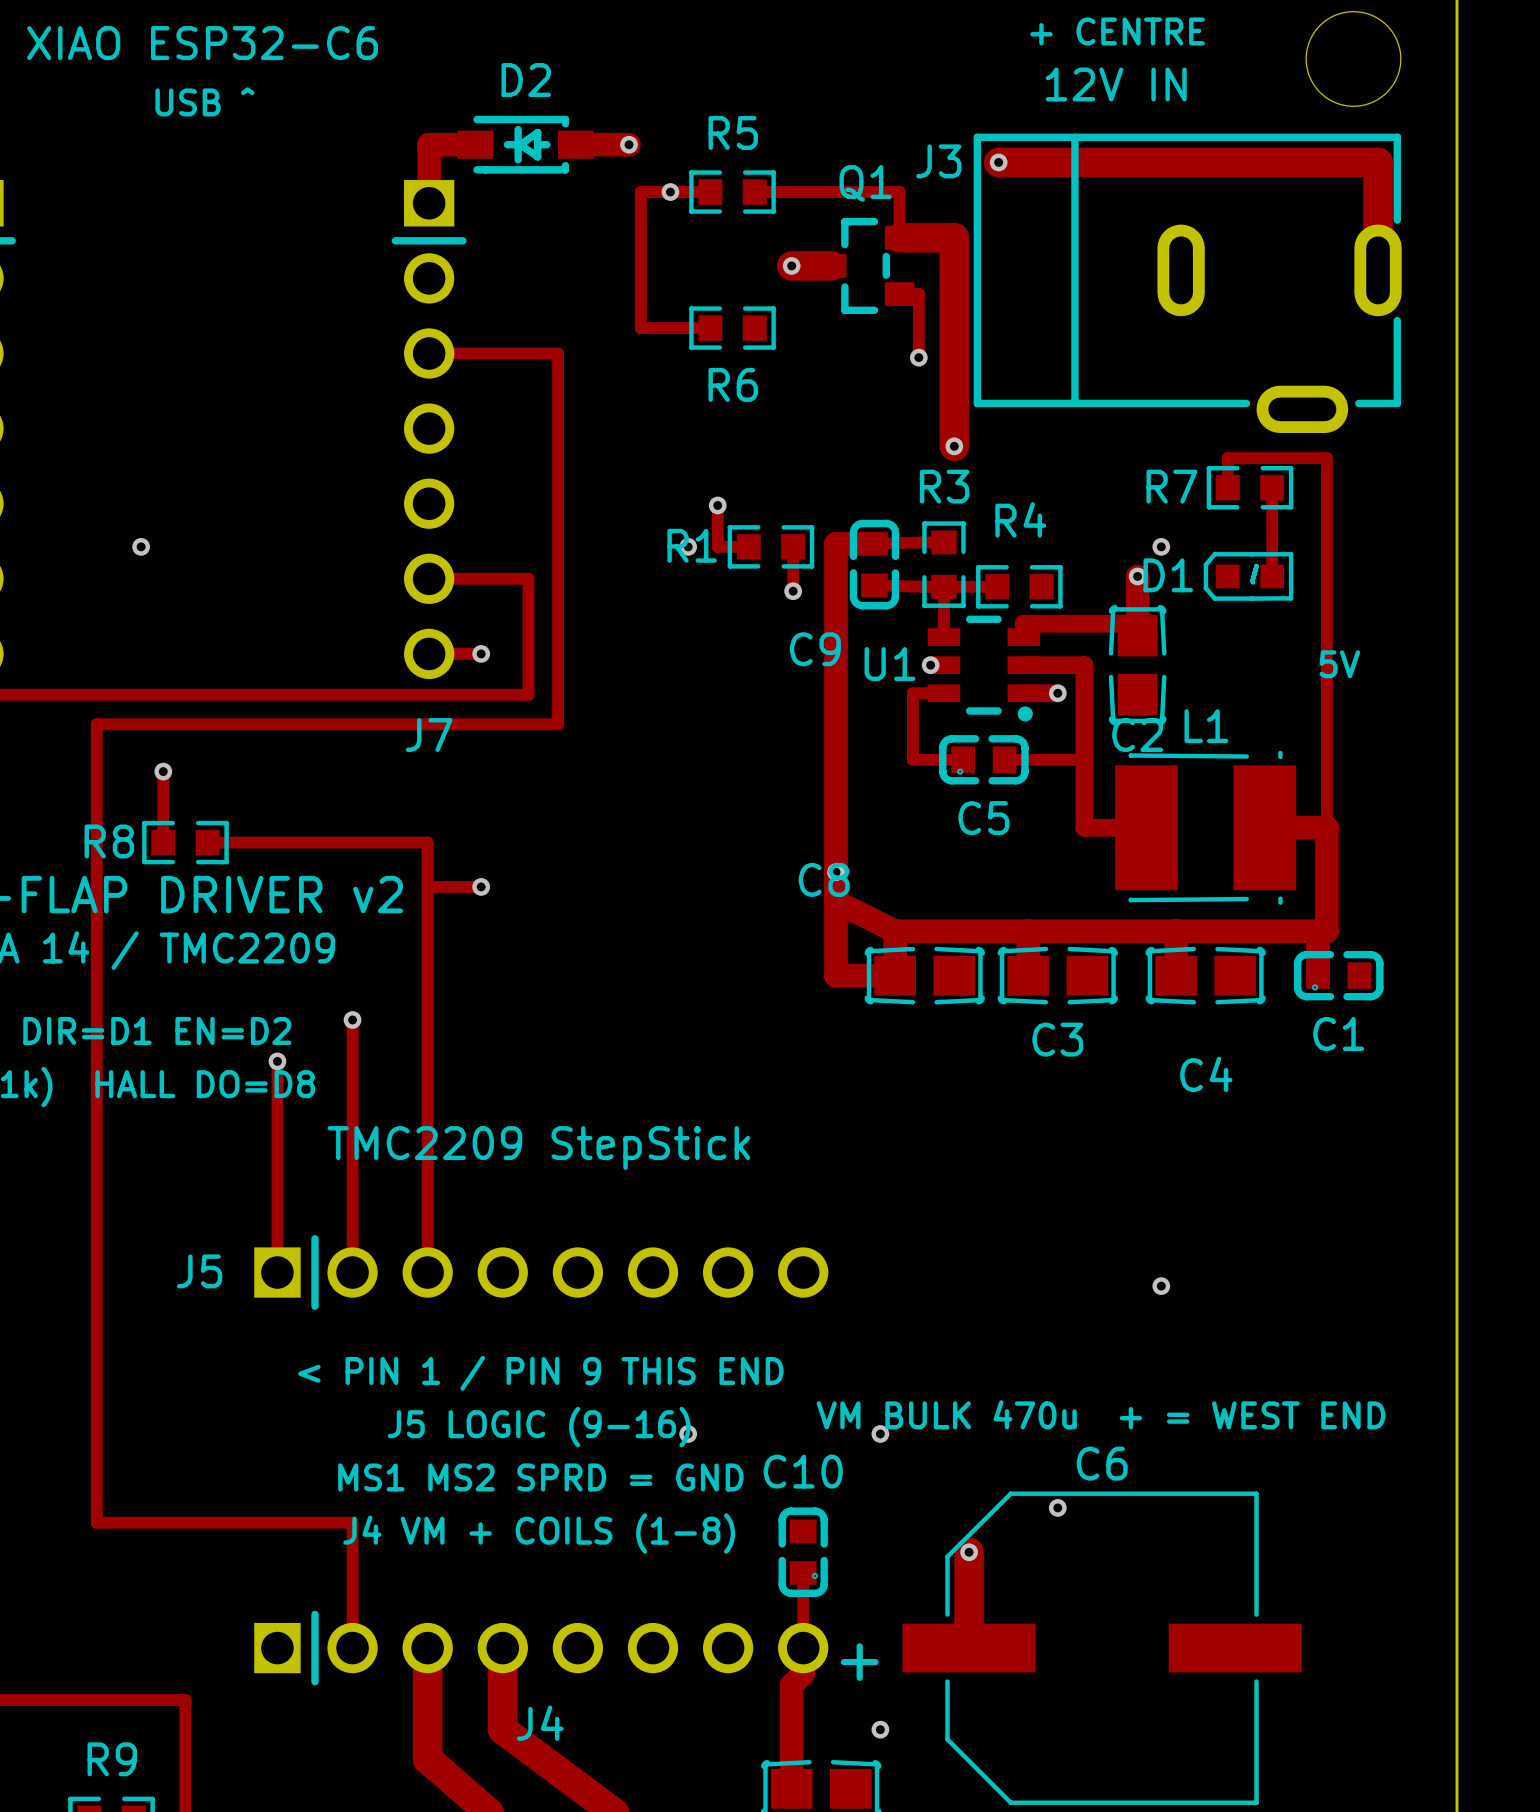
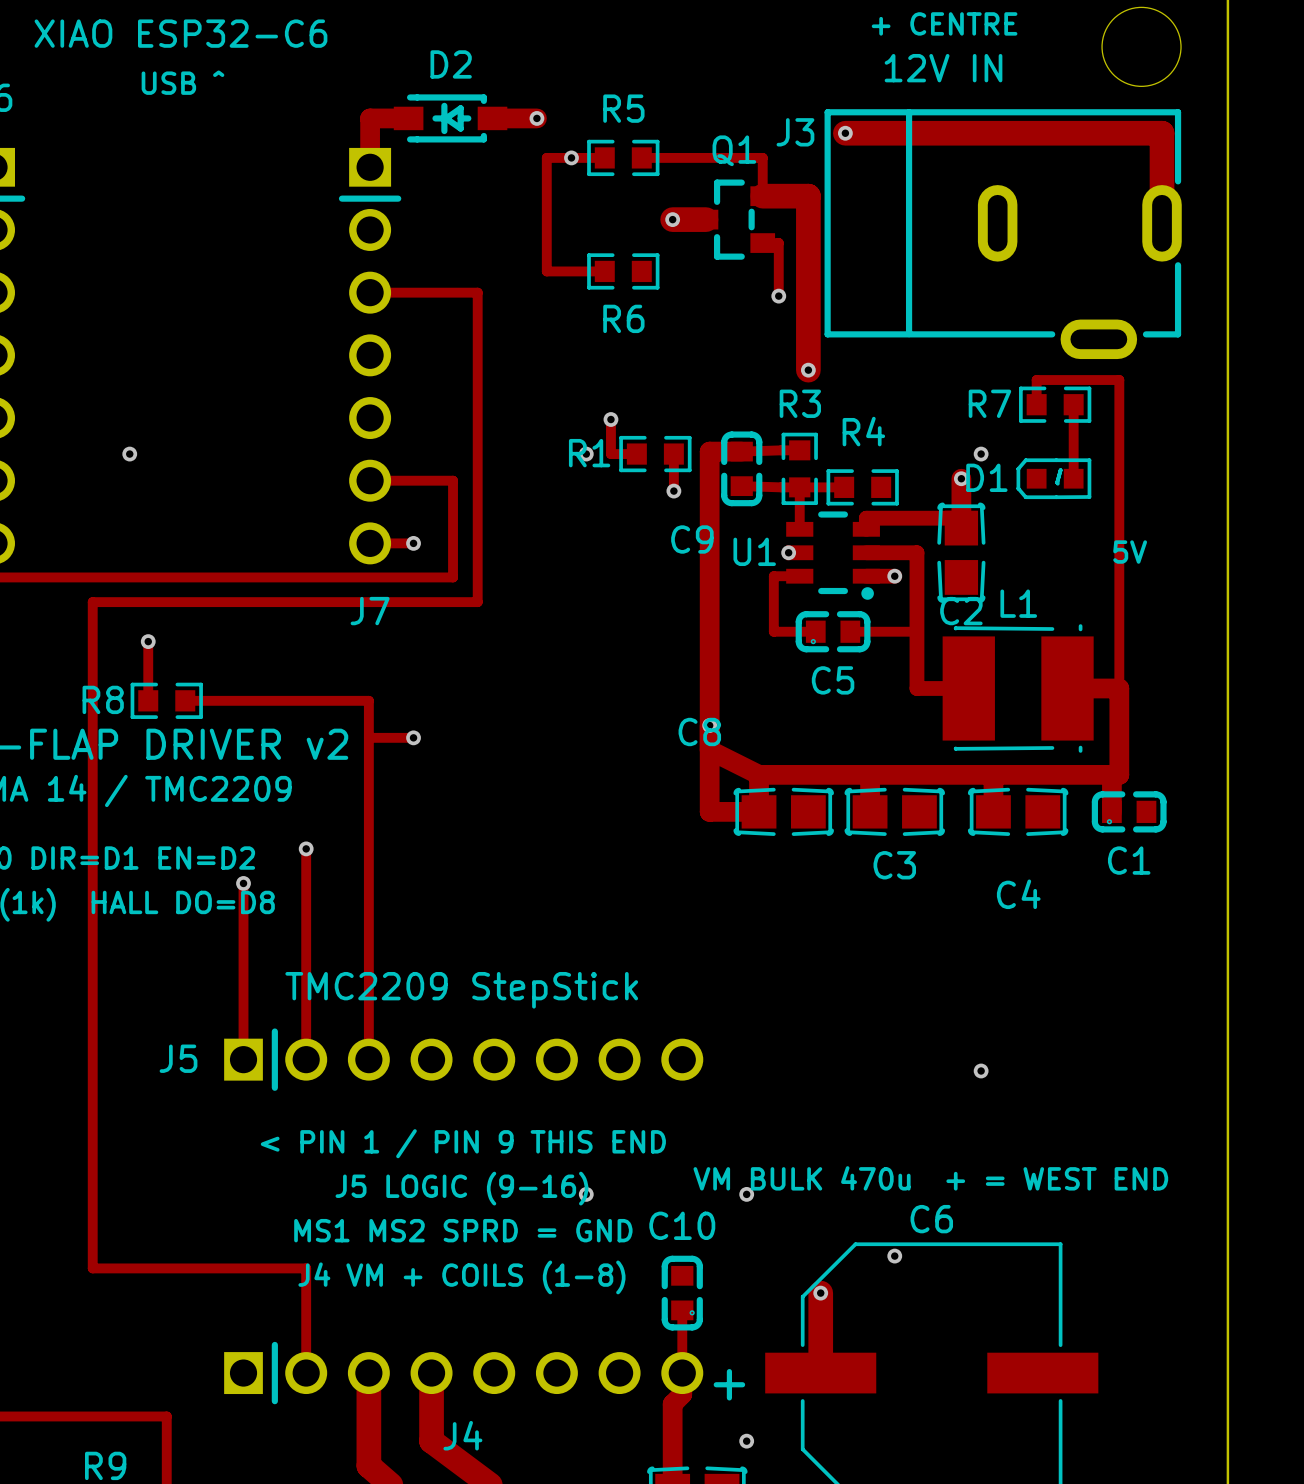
text position: TMC2209 StepStick (538, 1148) -> TMC2209 StepStick (461, 990)

